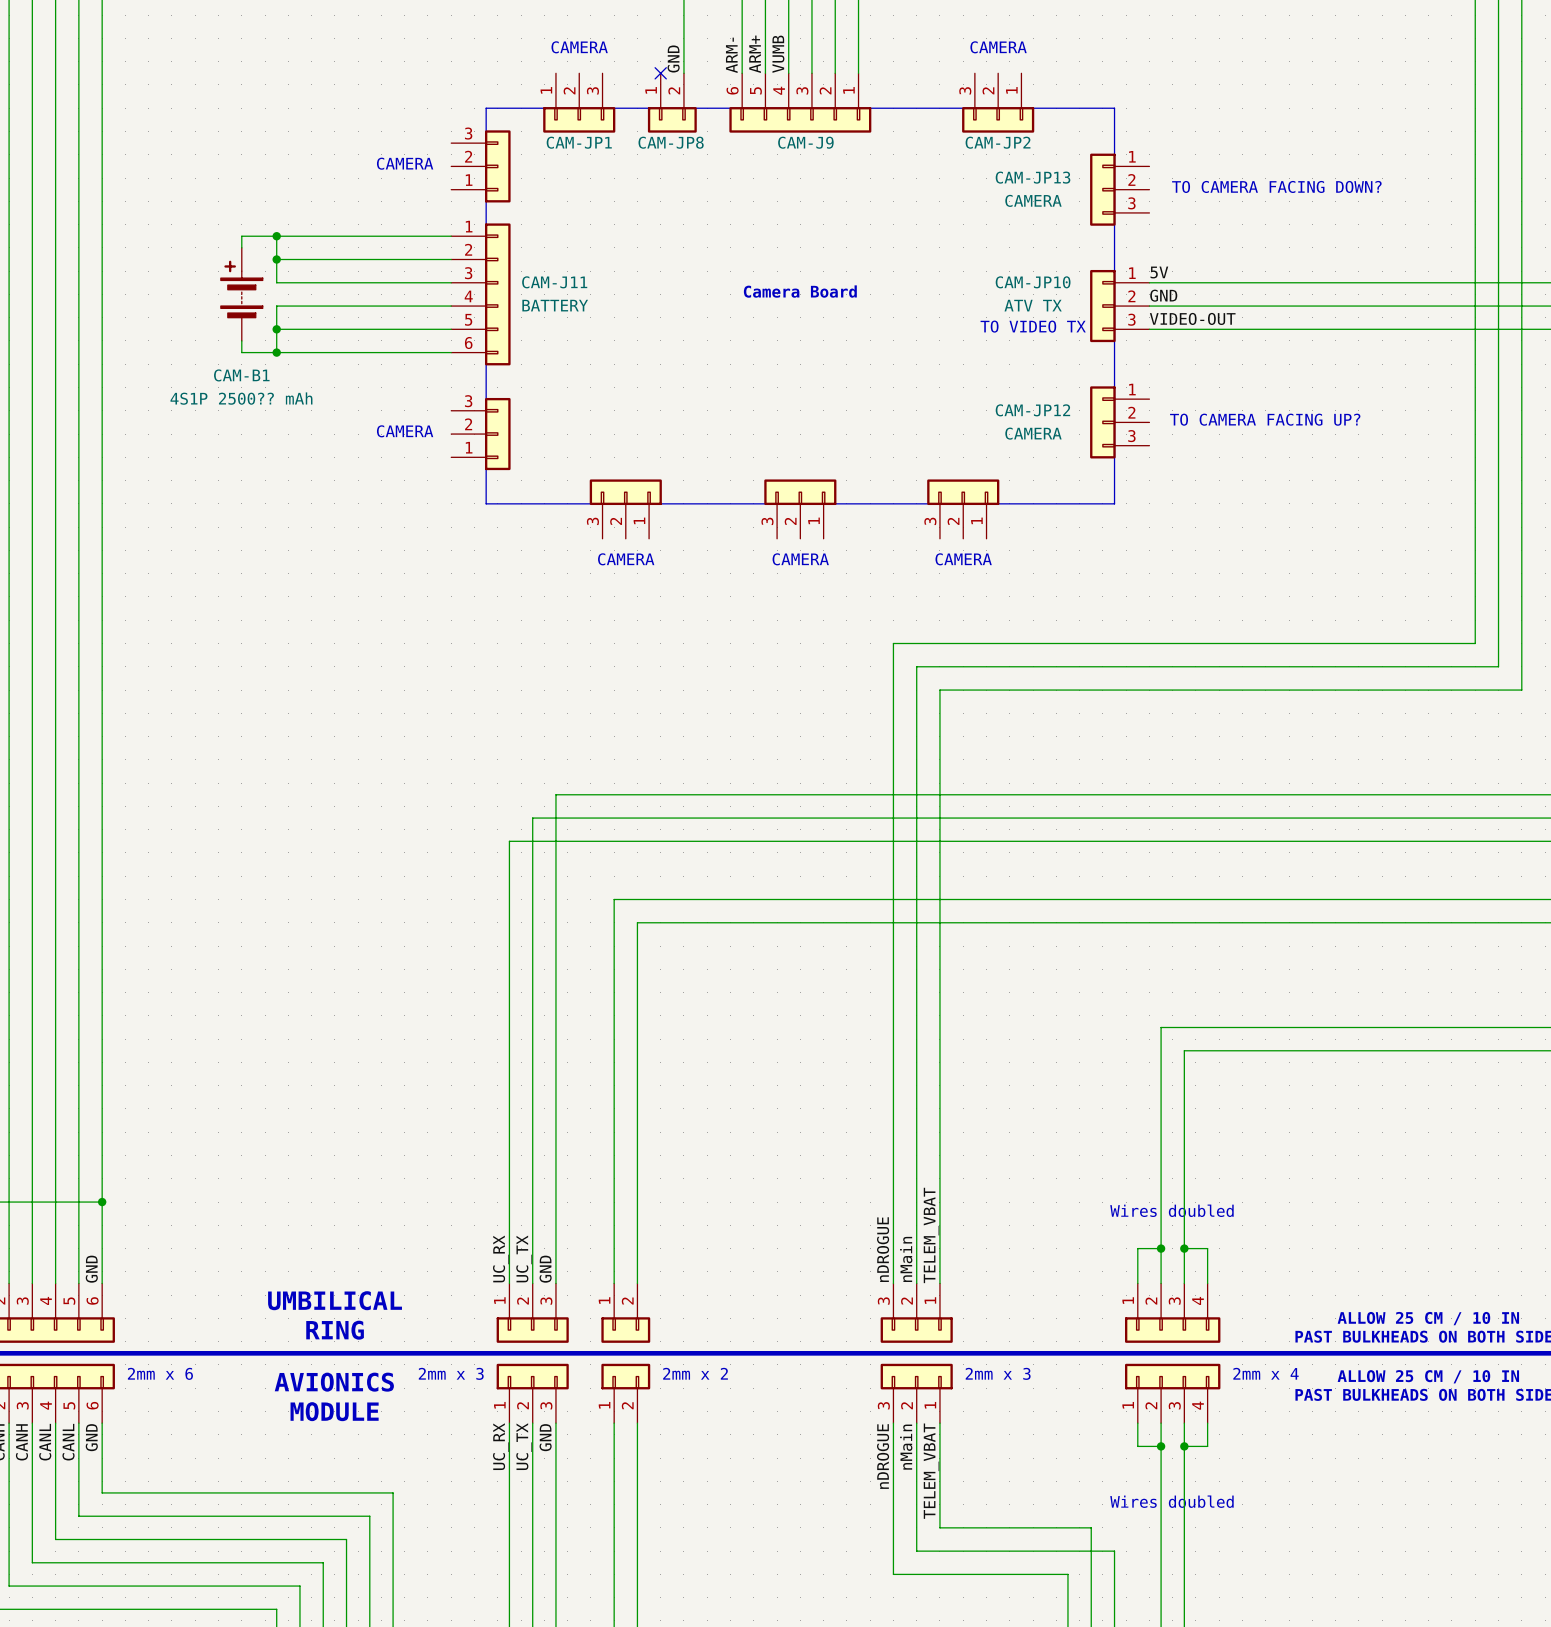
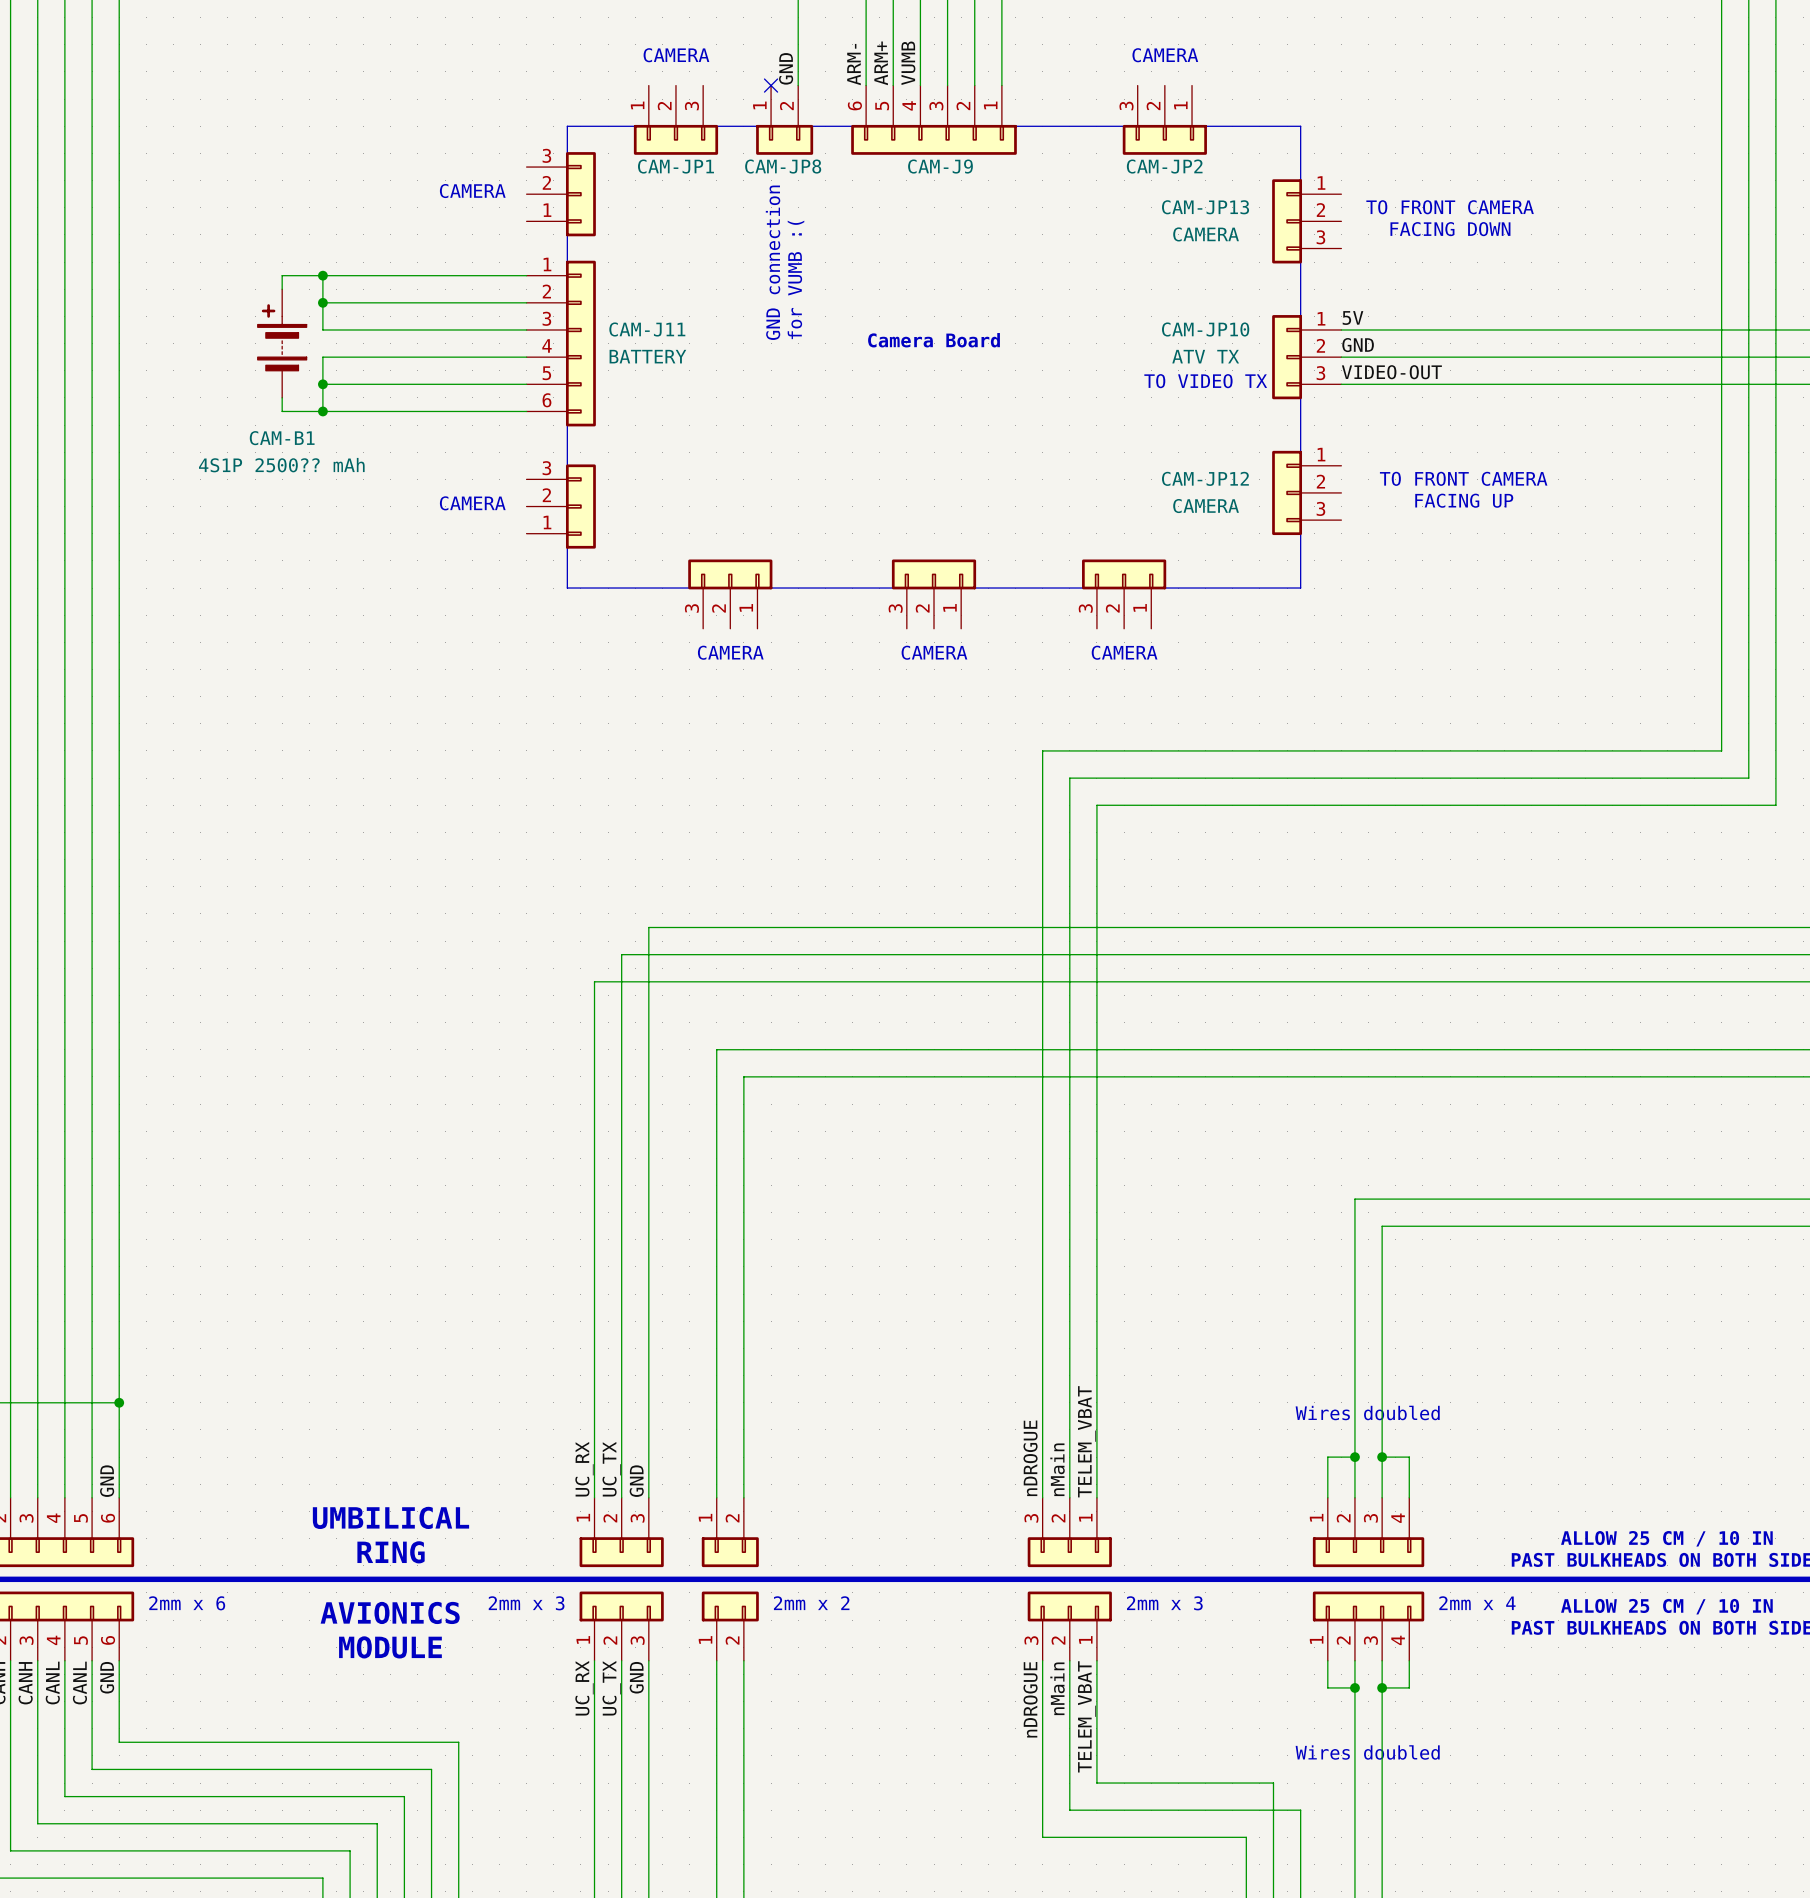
text: none -> TO FRONT CAMERA (1450, 207)
text: TO CAMERA FACING DOWN? (1276, 186) -> FACING DOWN (1450, 229)
text: none -> GND connection (773, 262)
text: none -> for VUMB :( (795, 279)
text: none -> TO FRONT CAMERA (1463, 478)
text: TO CAMERA FACING UP? (1265, 419) -> FACING UP (1464, 500)

